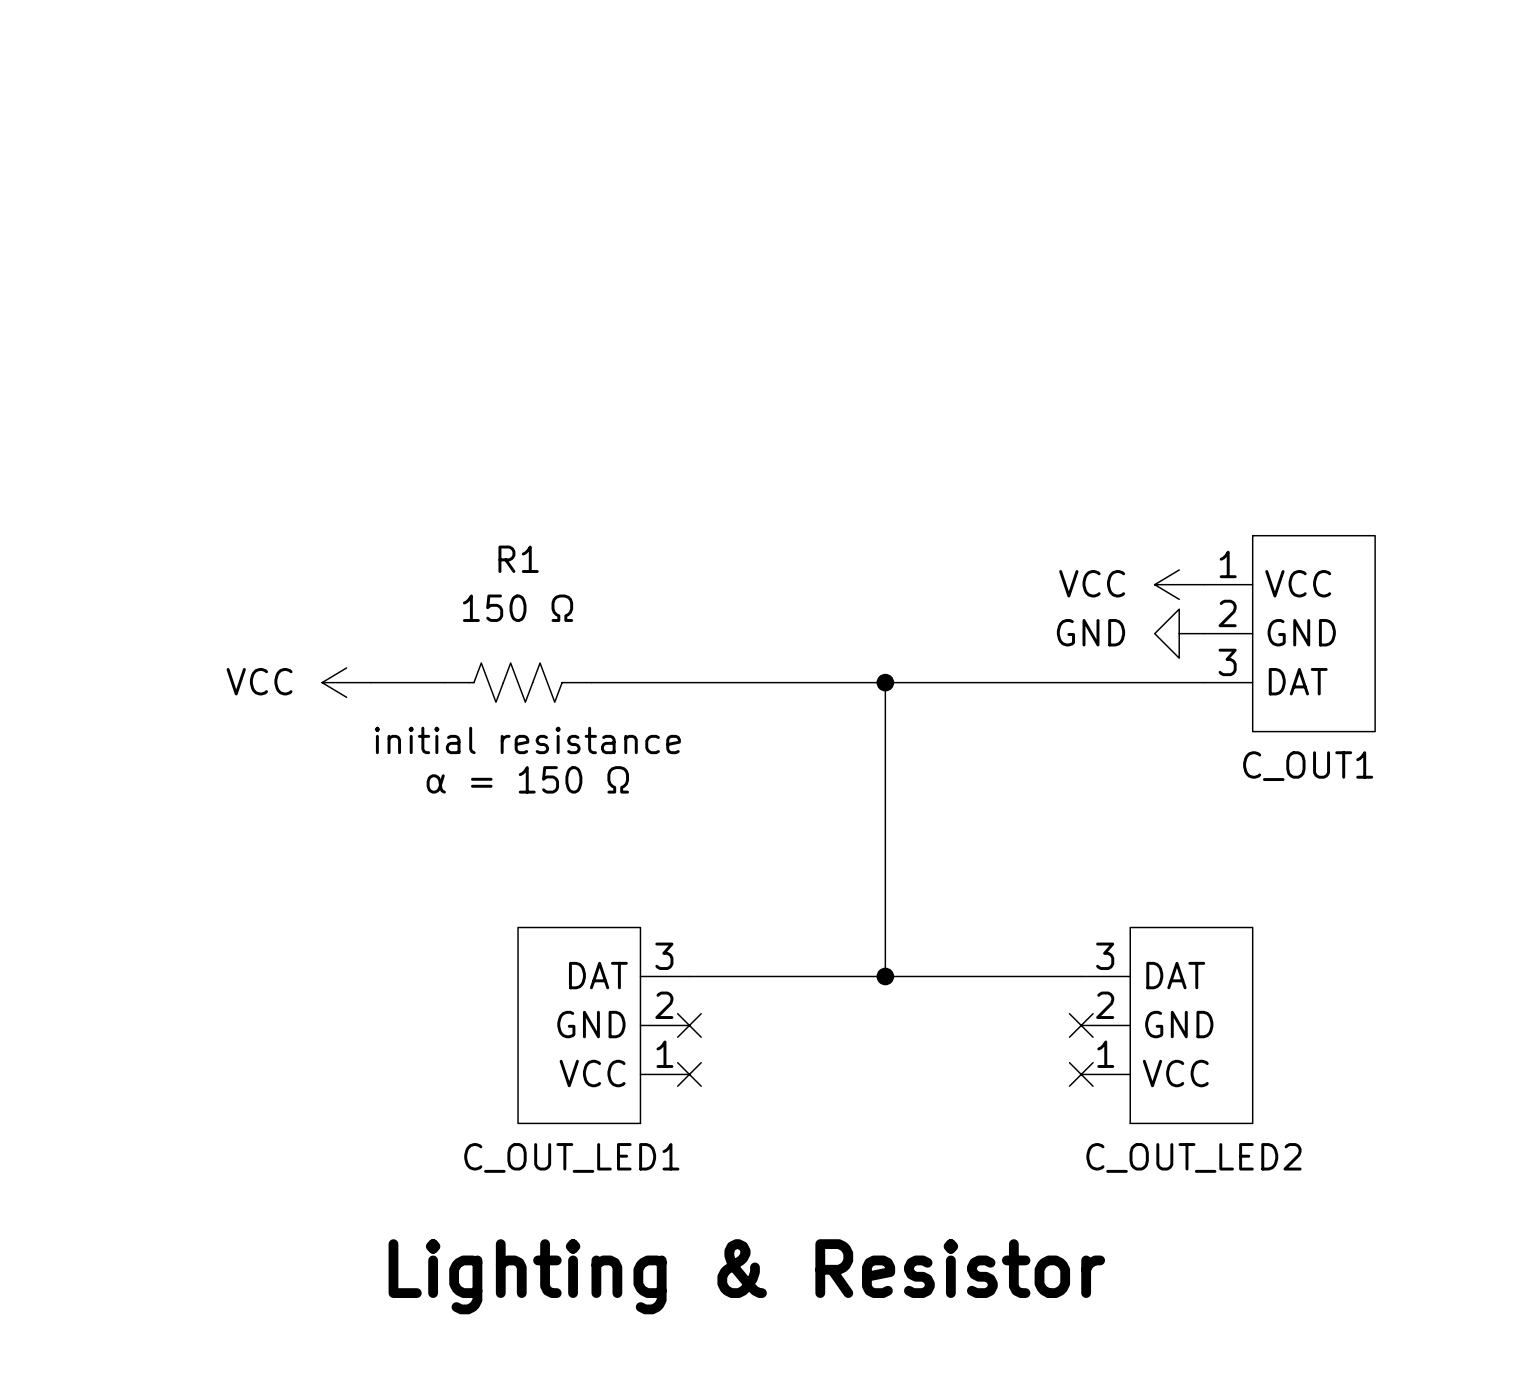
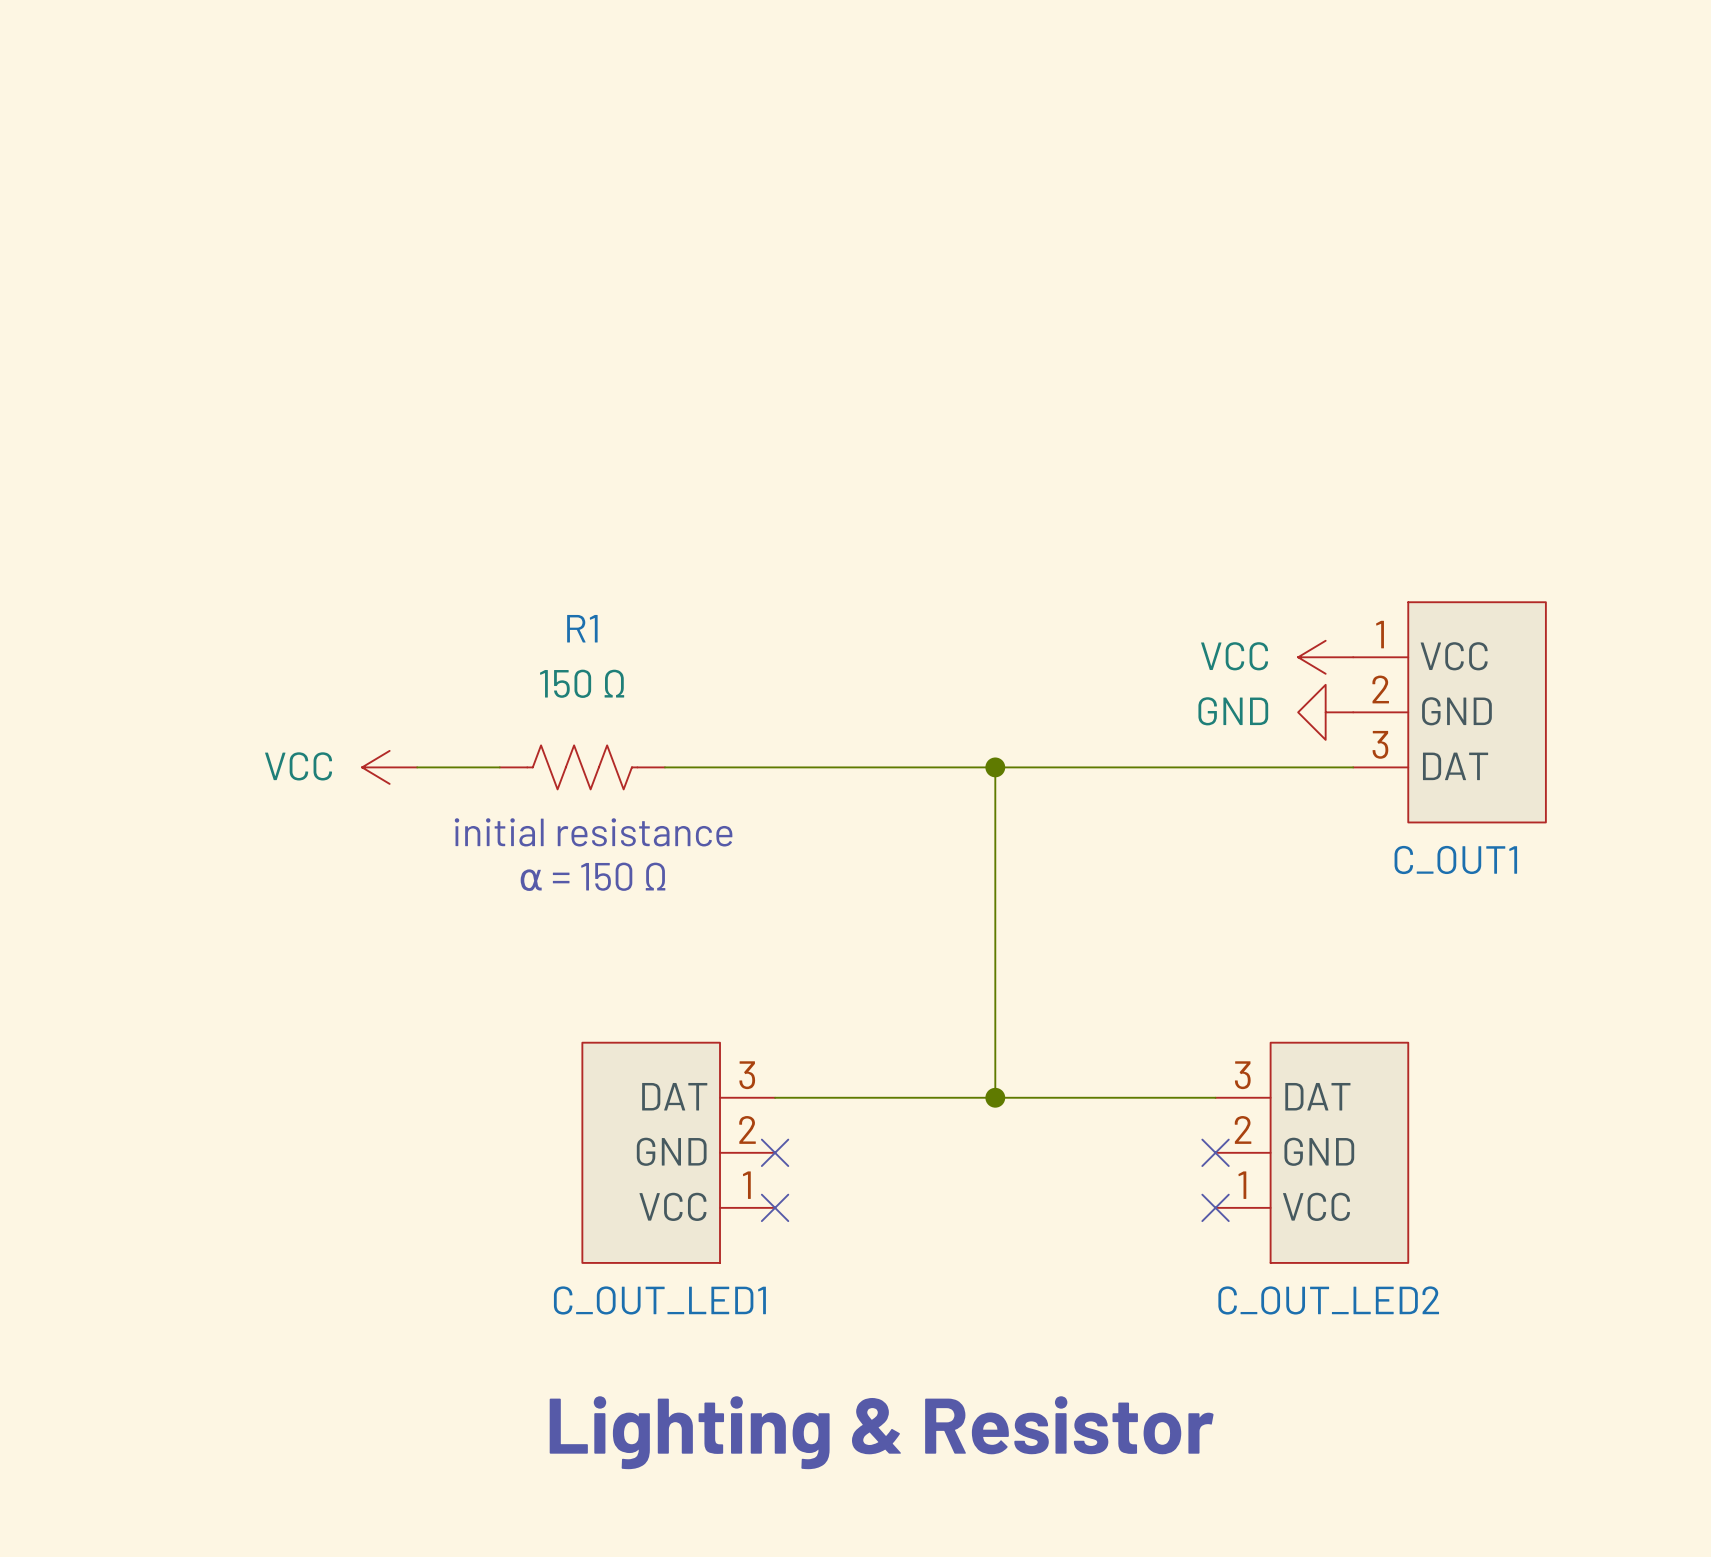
text position: Lighting & Resistor (746, 1276) -> Lighting & Resistor (881, 1432)

